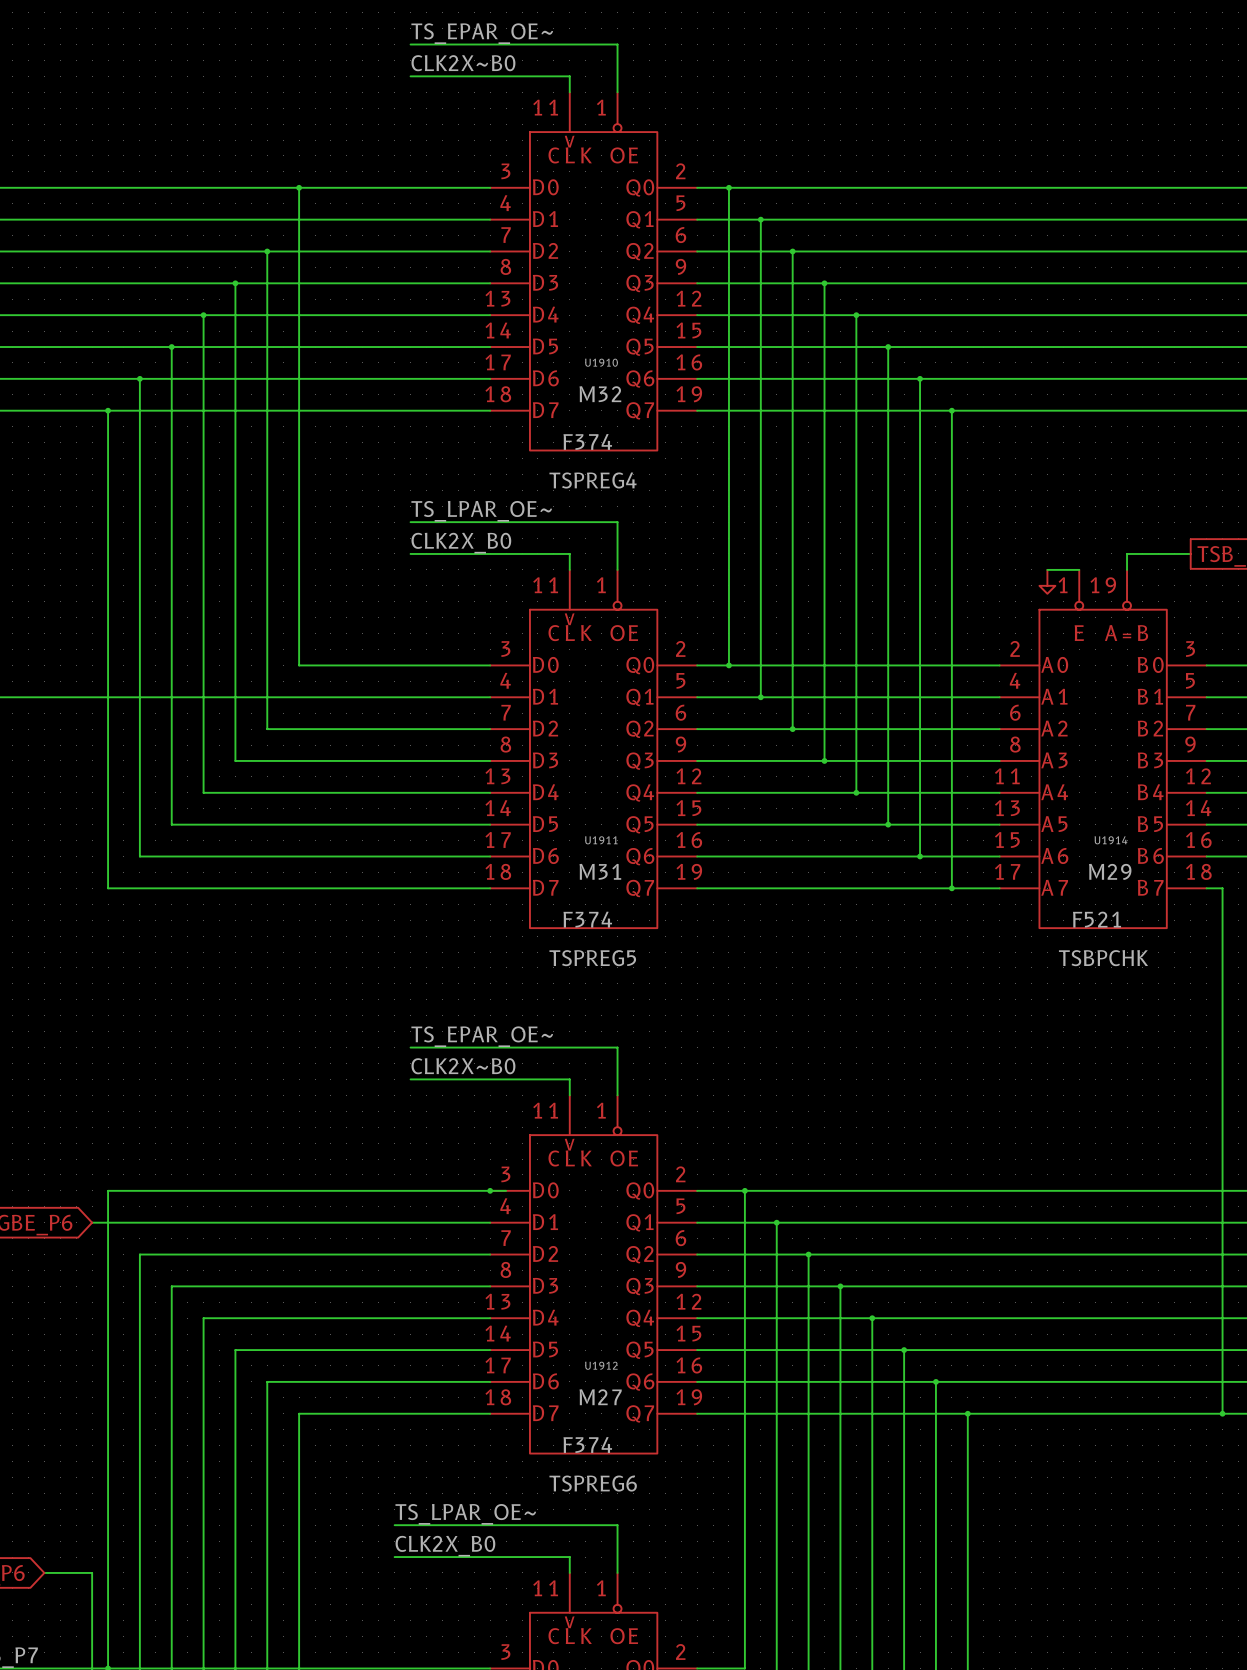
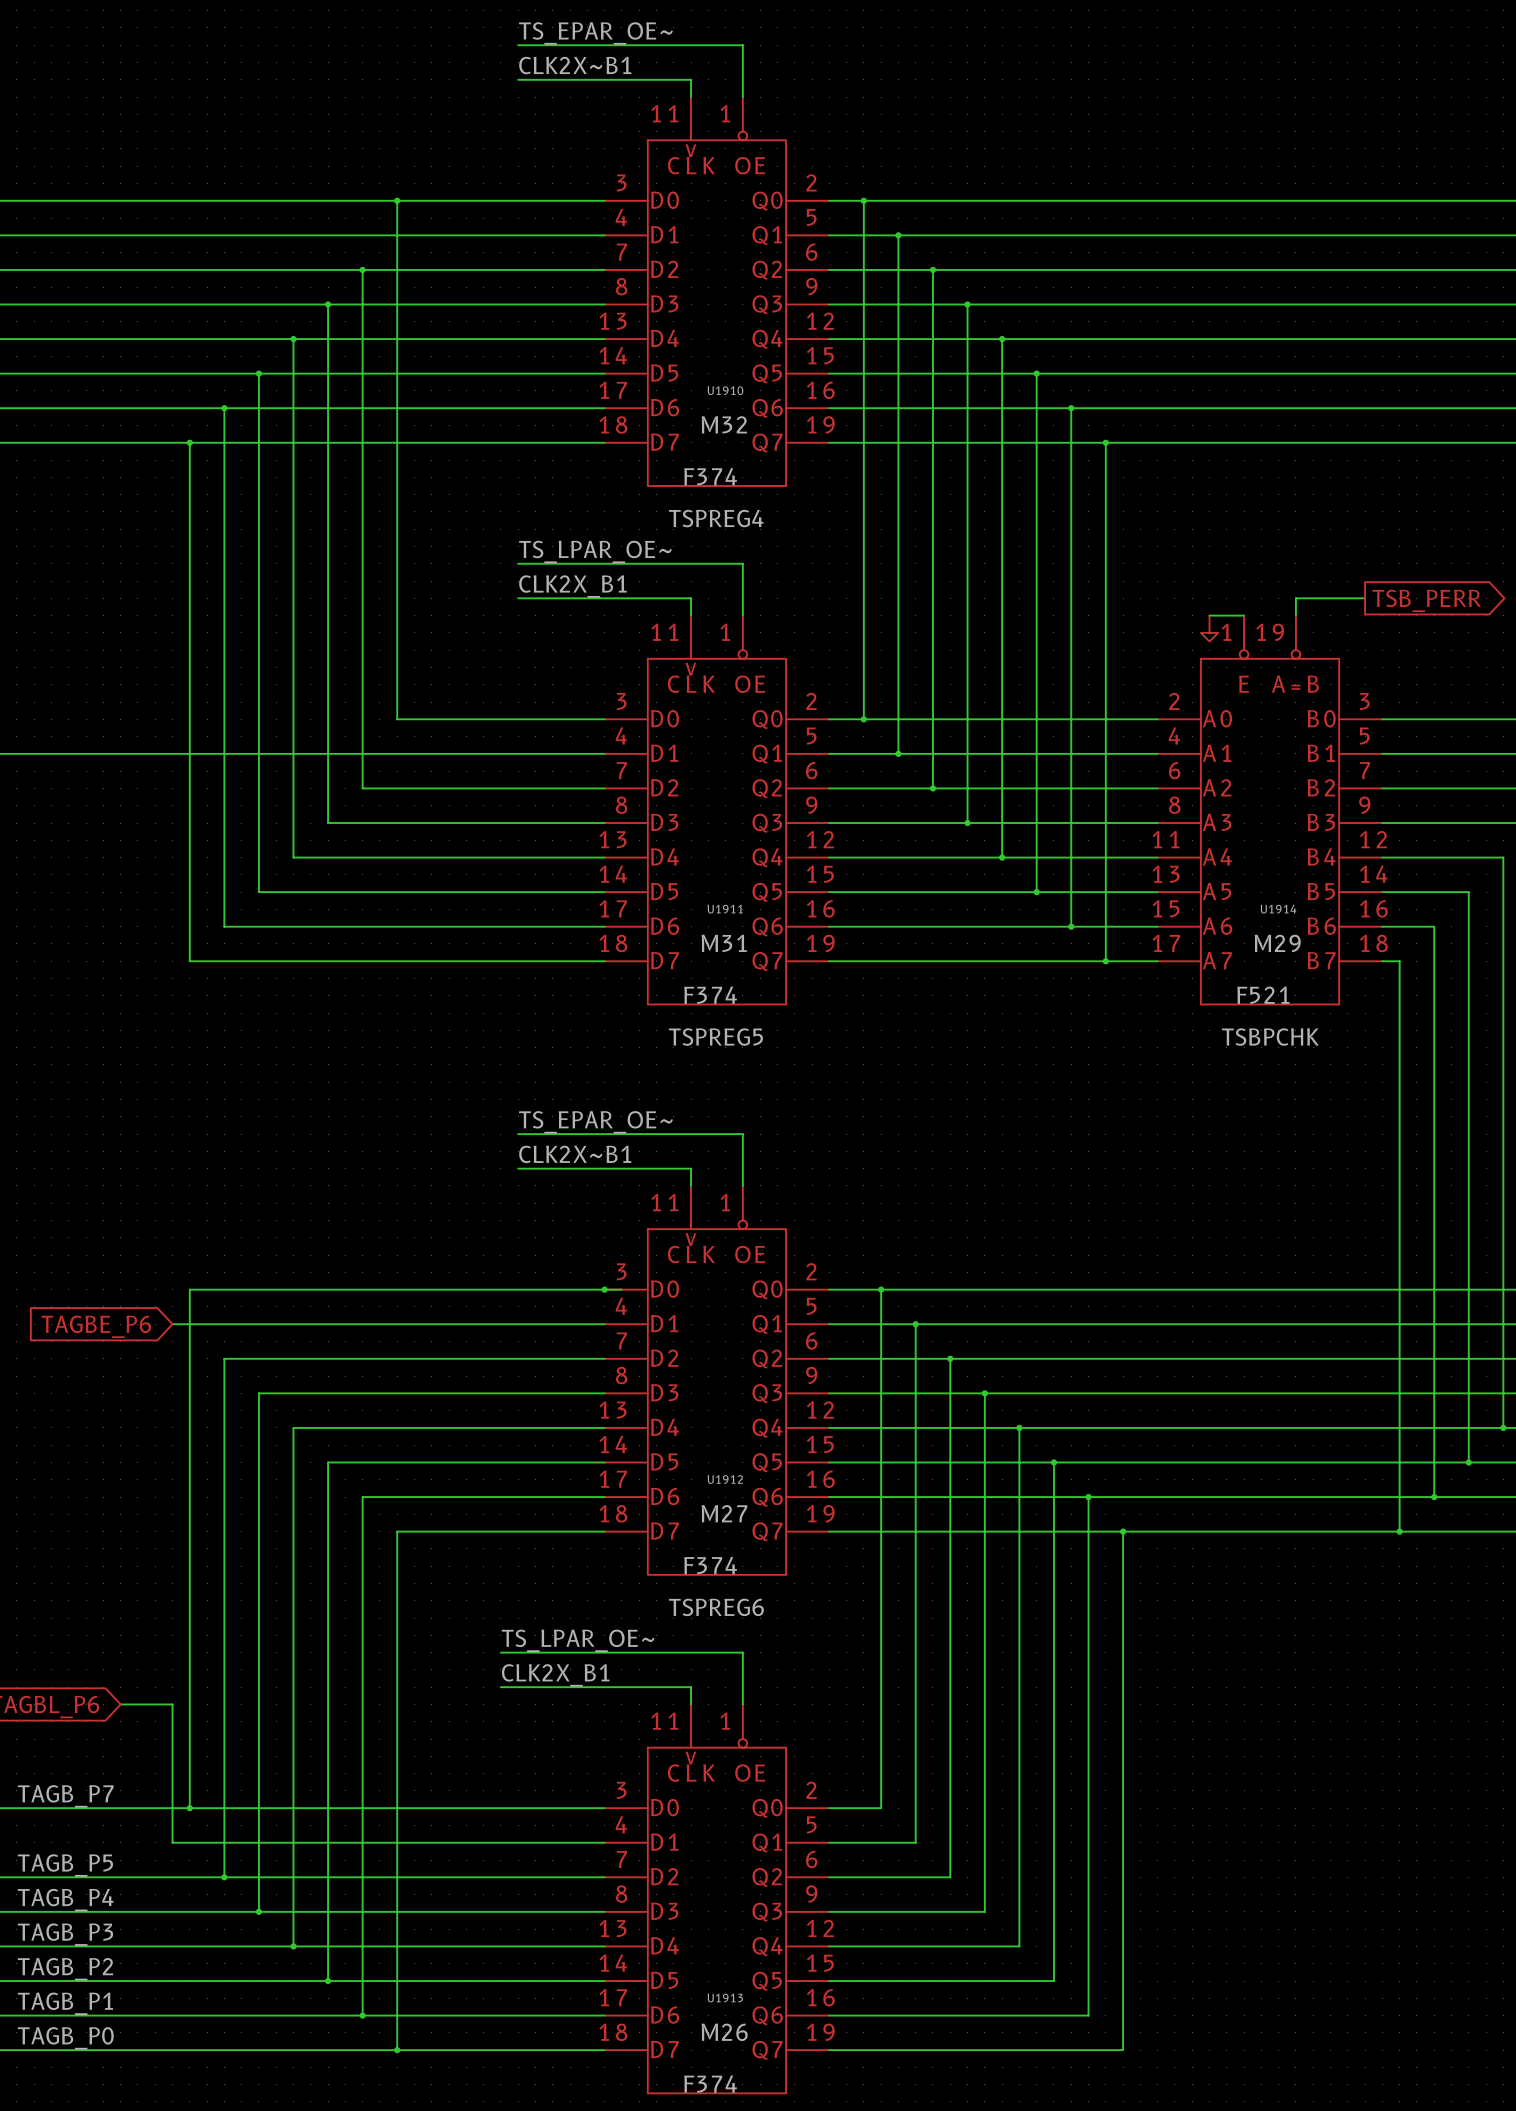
label: CLK2X~B0 (463, 63) -> CLK2X~B1 (575, 65)
label: CLK2X_B0 (461, 543) -> CLK2X_B1 (572, 586)
label: CLK2X~B0 (463, 1066) -> CLK2X~B1 (575, 1154)
label: CLK2X_B0 (445, 1546) -> CLK2X_B1 (555, 1675)

